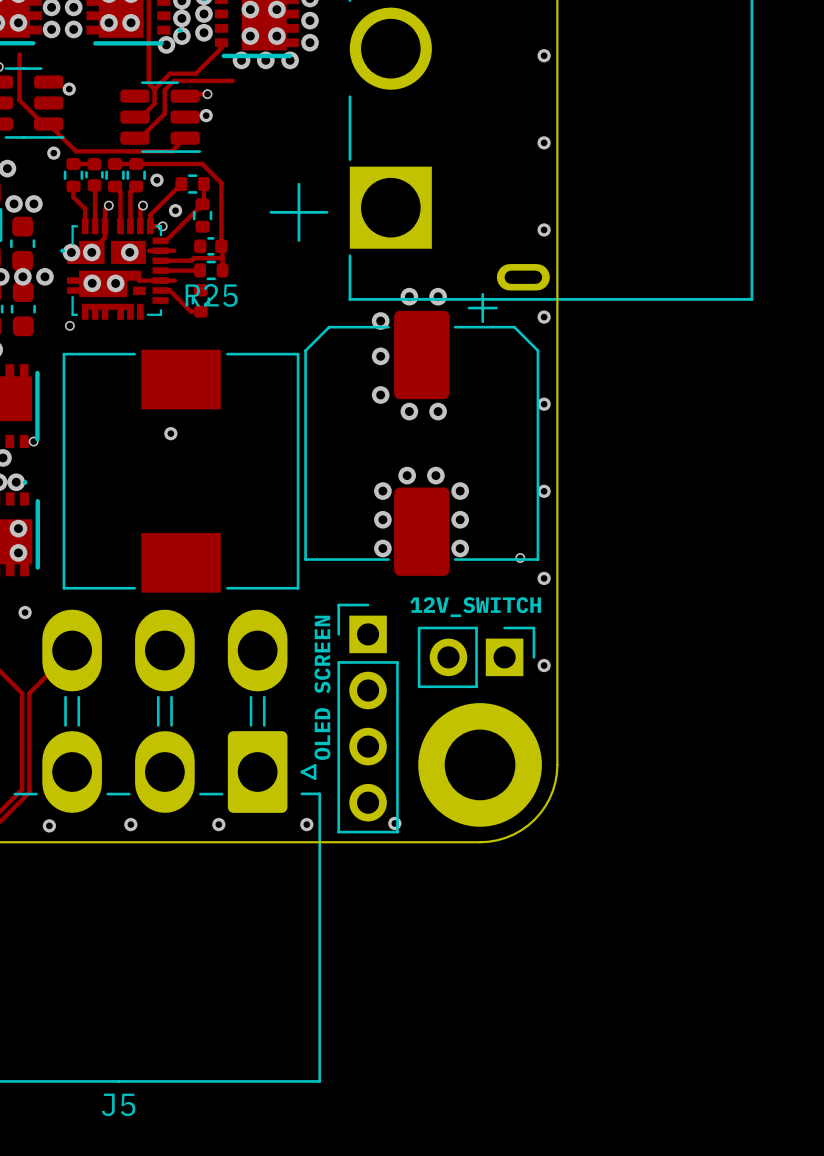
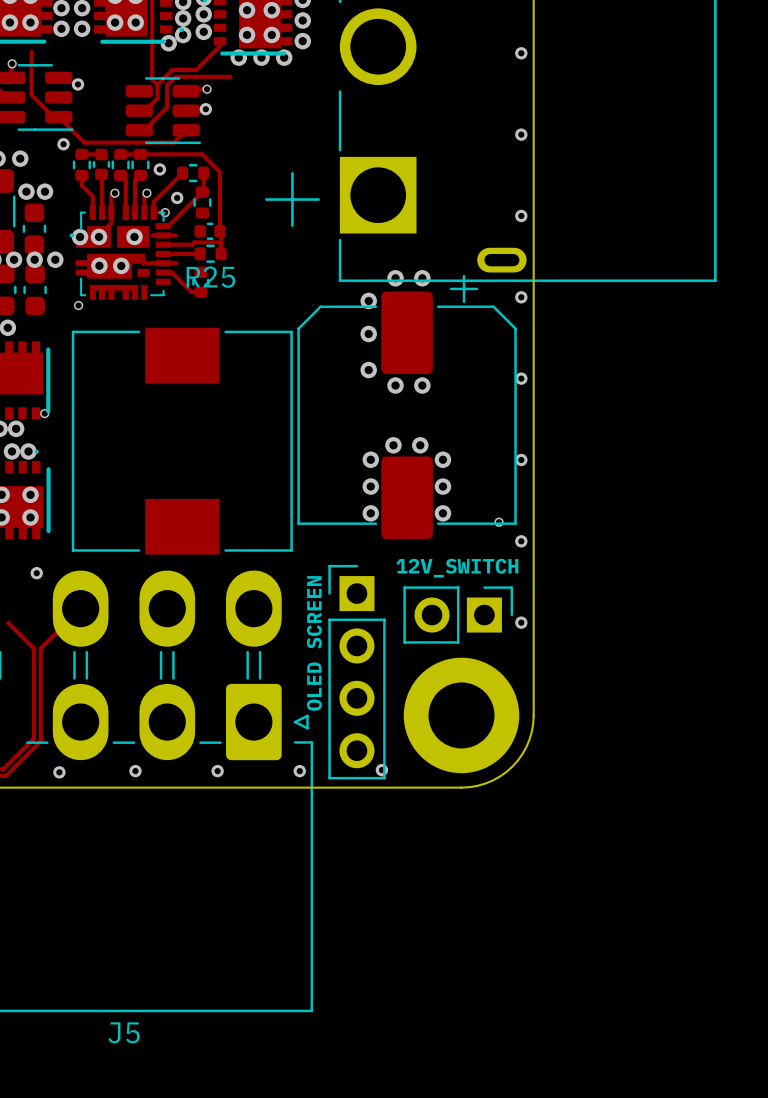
via: (170, 433) -> none

